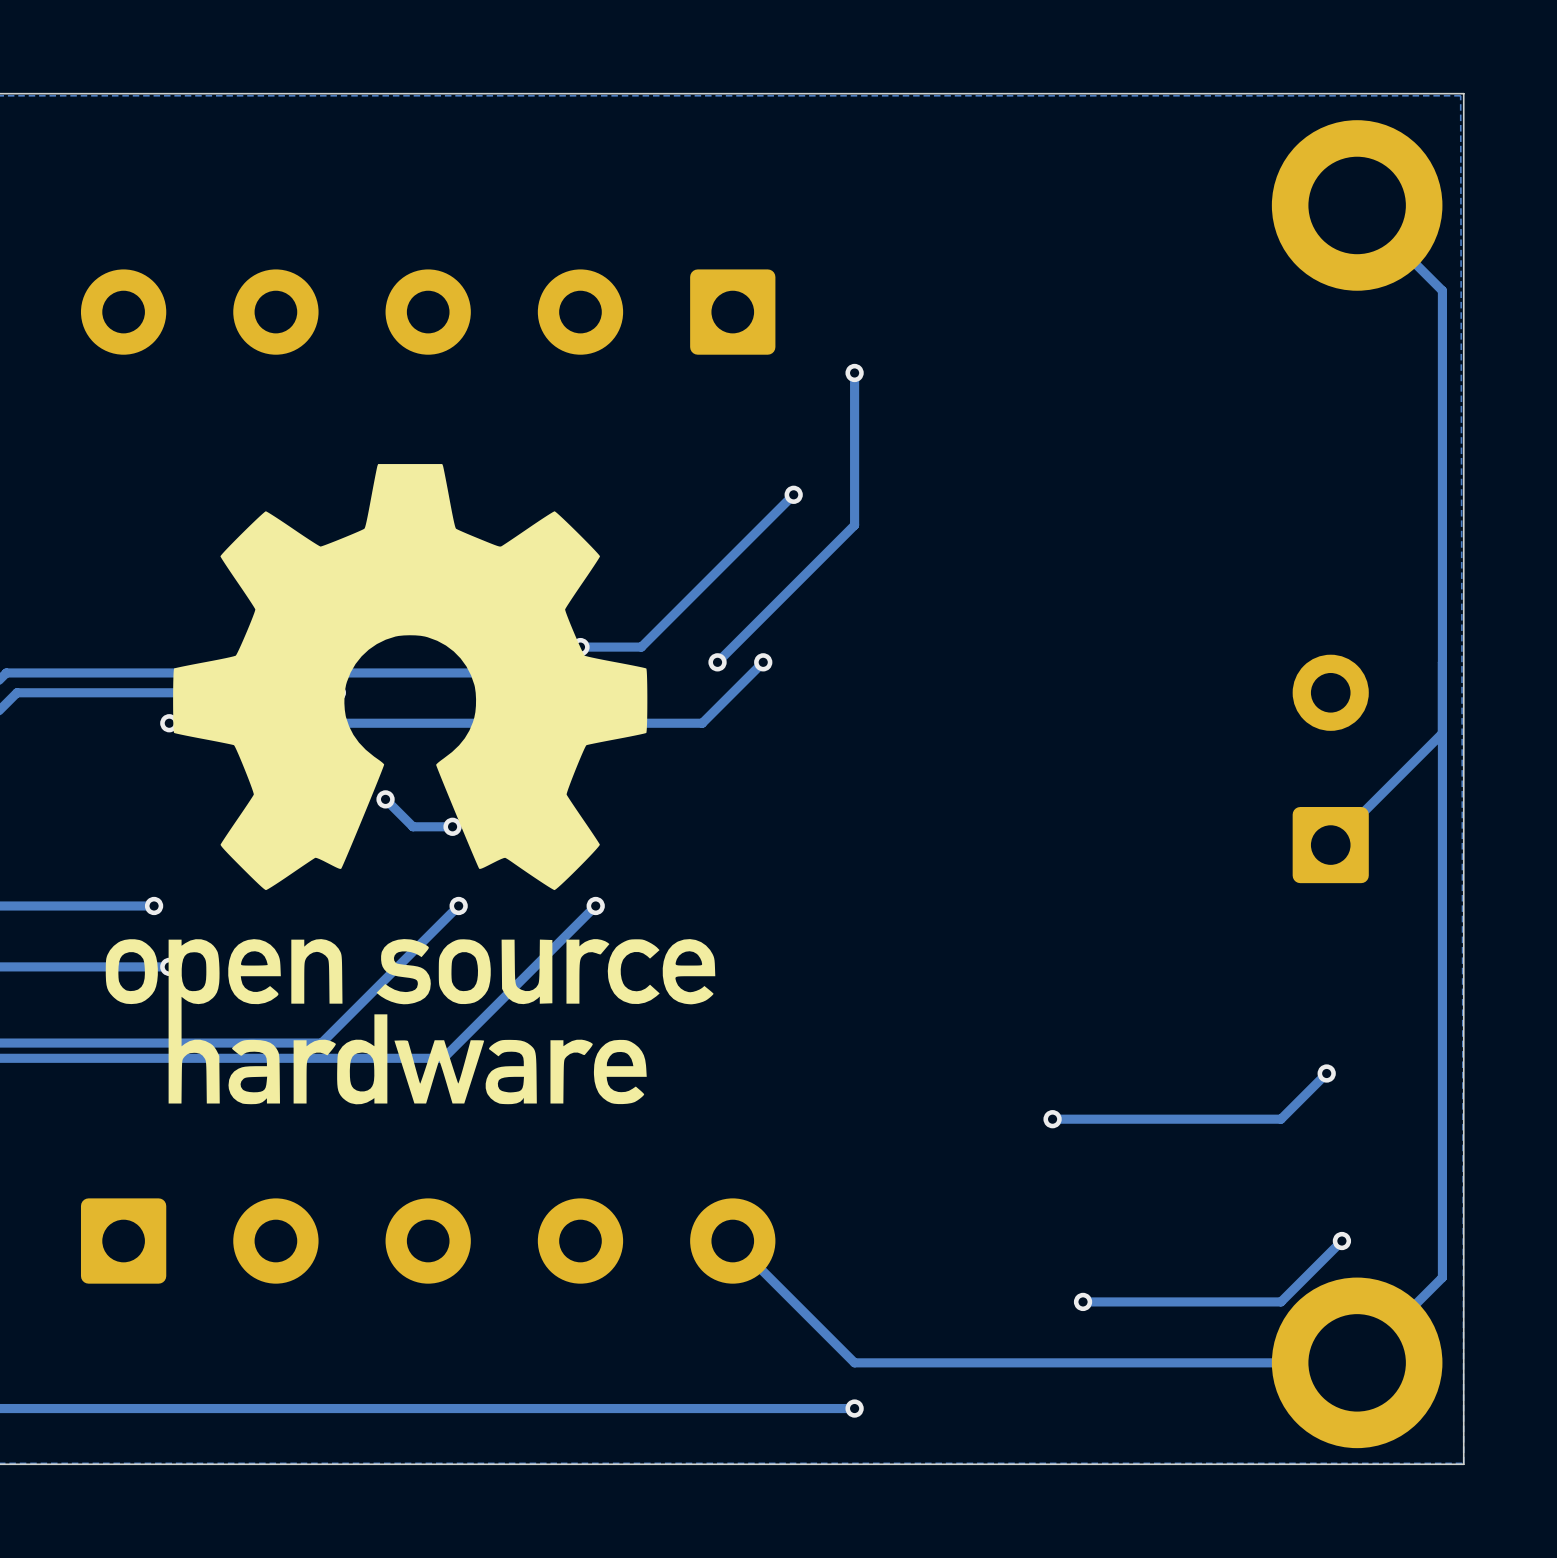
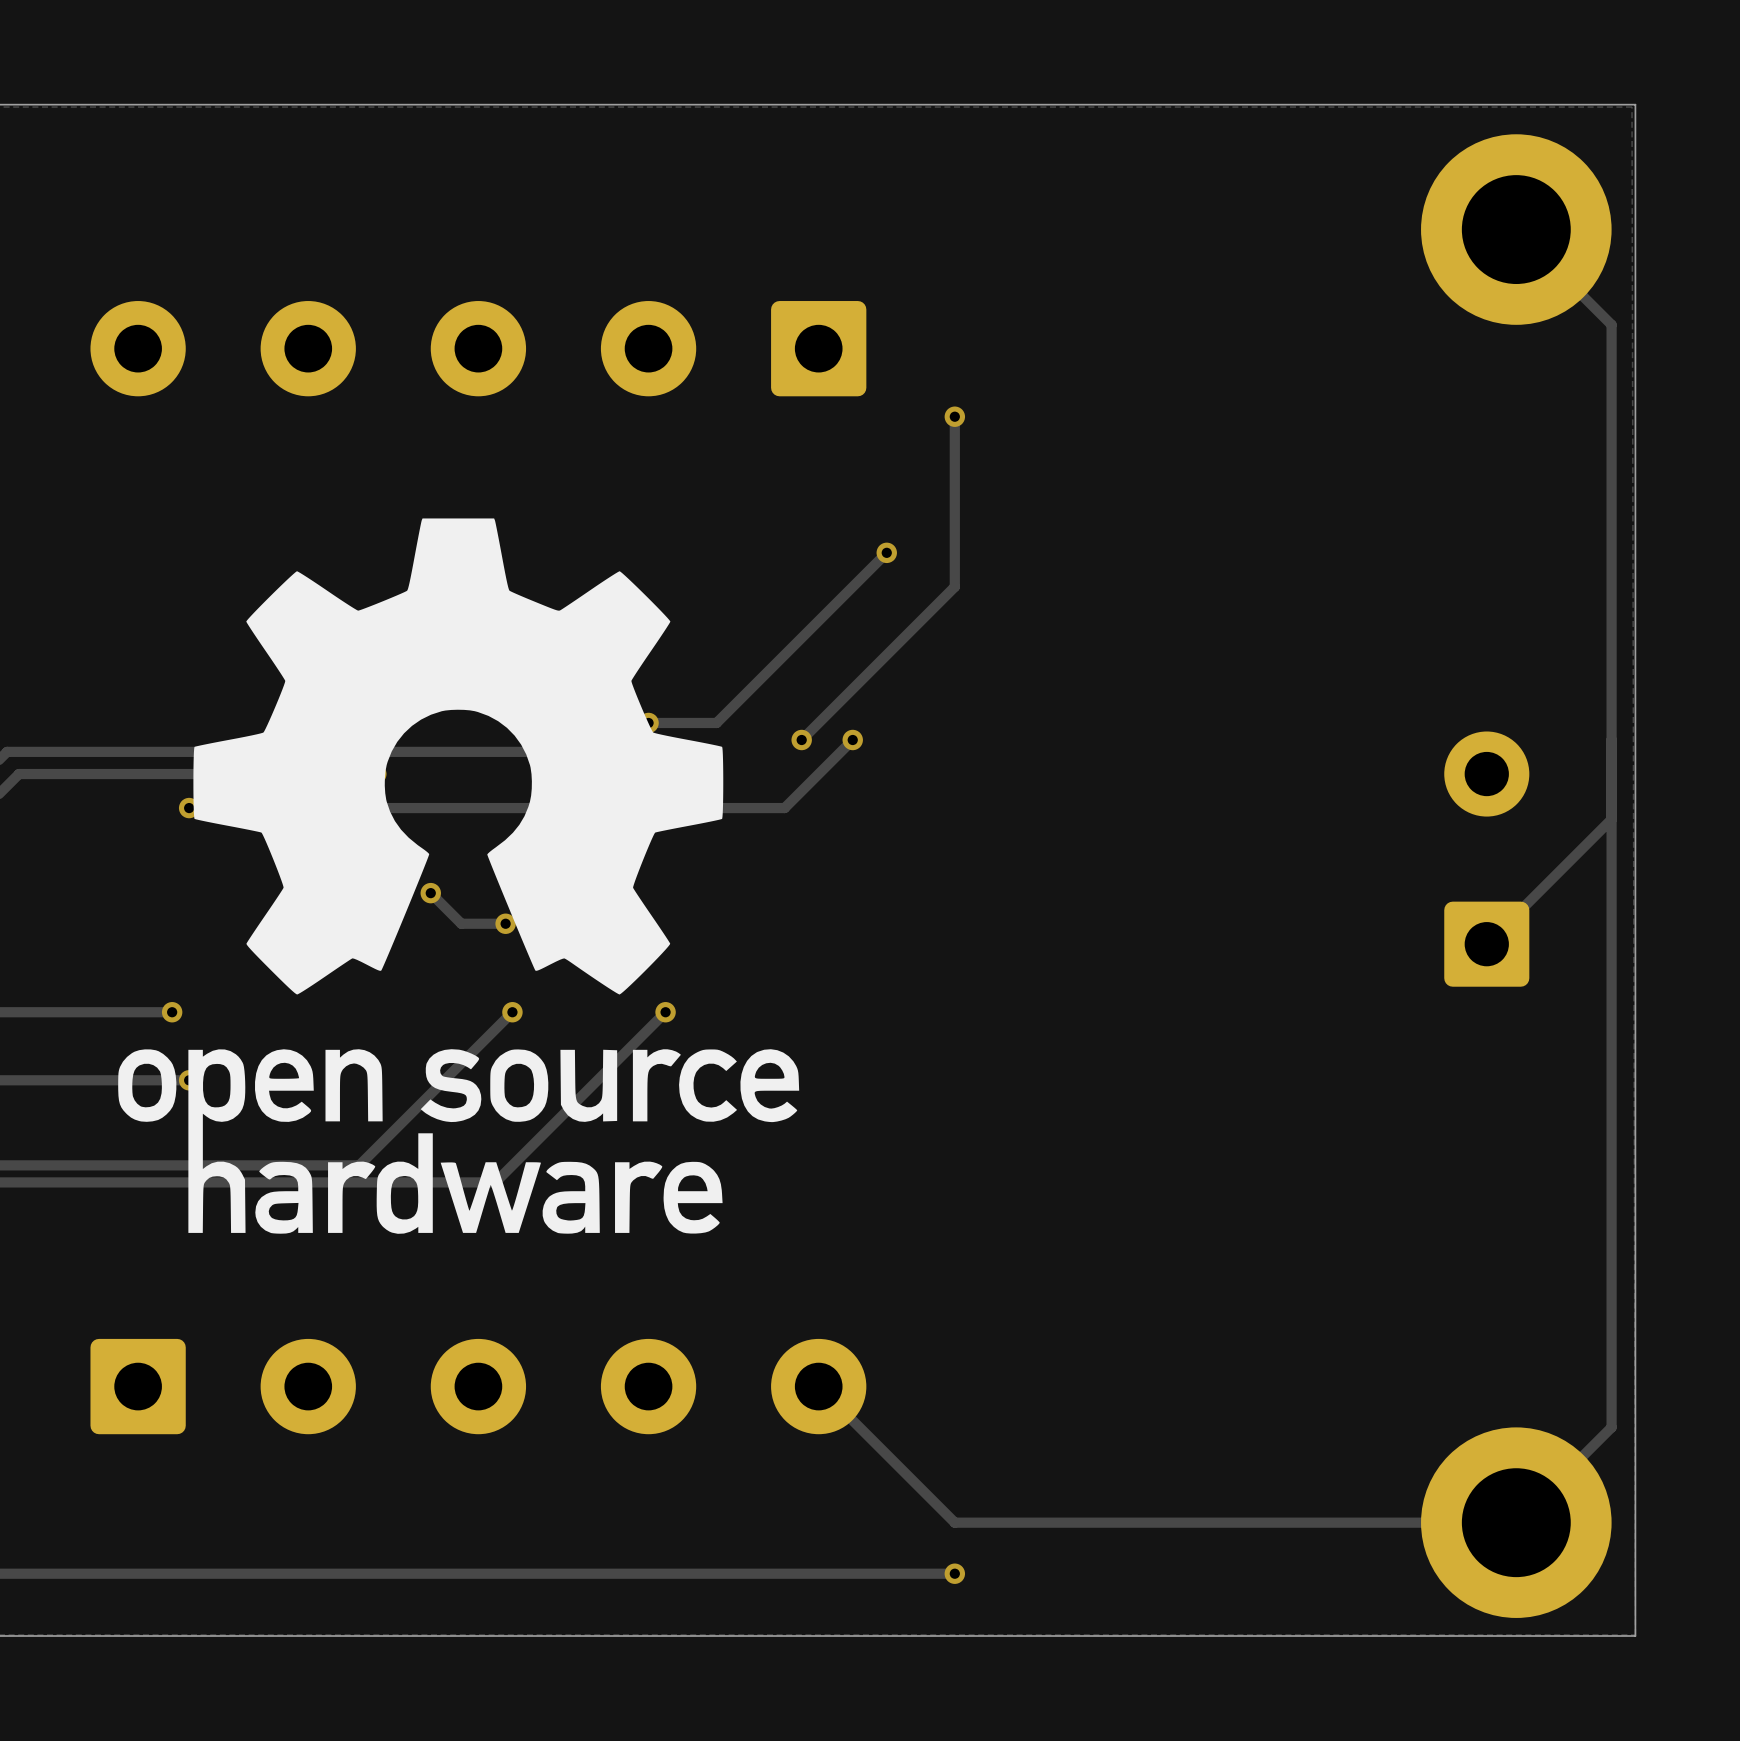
track: (1326, 1073) (1281, 1119) (1052, 1119) -> none
via: (1326, 1073) -> none
via: (1052, 1119) -> none
track: (1341, 1241) (1281, 1301) (1083, 1301) -> none
via: (1341, 1241) -> none
via: (1083, 1301) -> none

